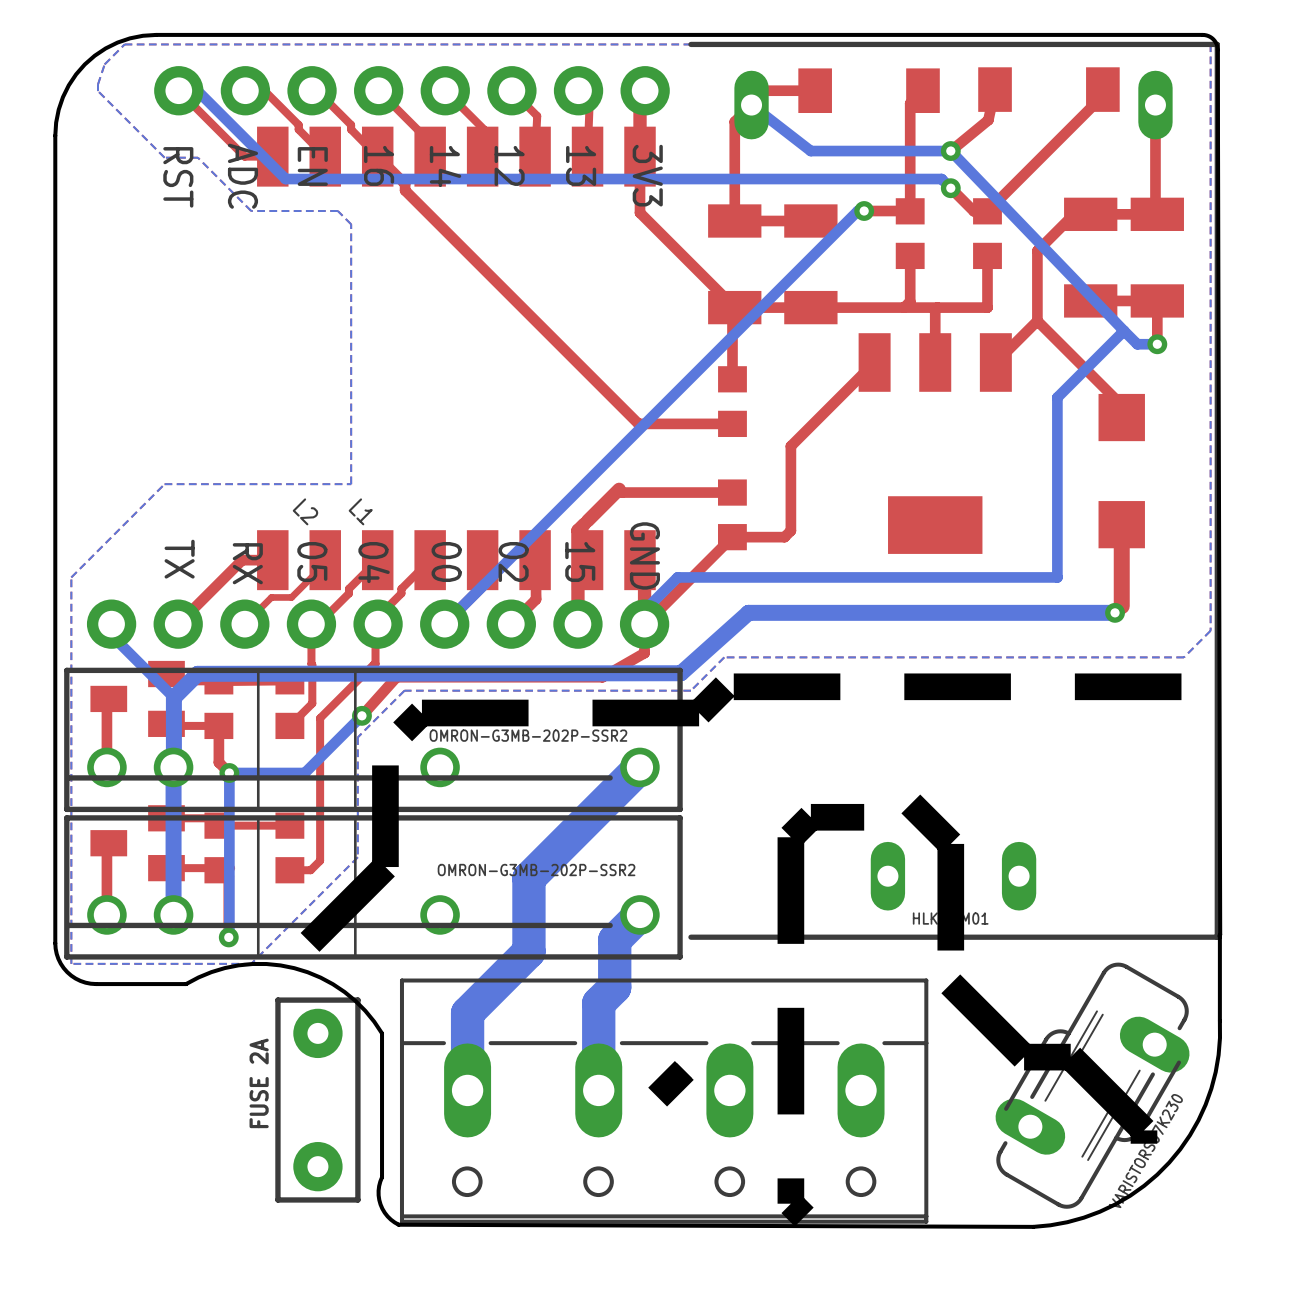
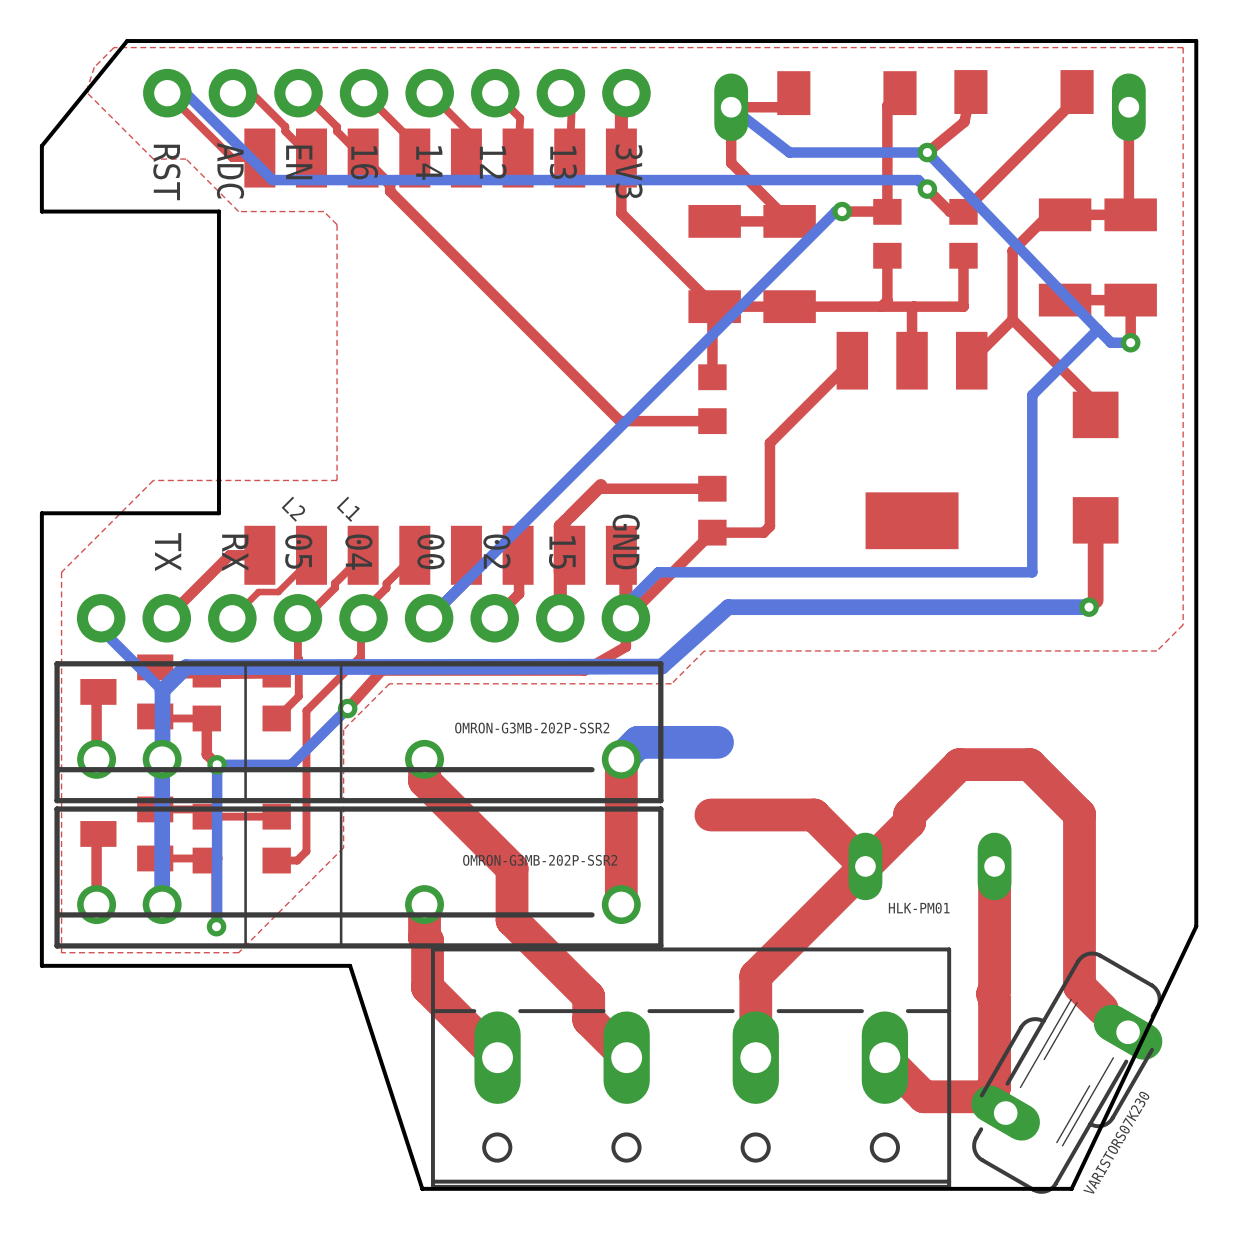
board edge: none -> (1196, 41) (127, 41) (41, 145) (41, 211) (218, 211) (218, 513) (41, 513) (41, 965) (350, 965) (422, 1188) (1071, 1188) (1196, 926) (1196, 41)
line: (690, 44) (1217, 44) (1217, 937) (690, 937) -> none
bottom zone outline: (1210, 44) (1210, 630) (1183, 657) (724, 657) (690, 690) (404, 690) (357, 737) (357, 857) (251, 963) (71, 963) (71, 577) (164, 484) (351, 484) (351, 224) (337, 211) (251, 211) (197, 157) (164, 157) (98, 91) (98, 84) (104, 64) (124, 44) (1210, 44) -> none
top track: (815, 90) (765, 90) (734, 121) (734, 220) -> (793, 93) (779, 107) (731, 107) (731, 162) (789, 221)
board edge: (1181, 686) (725, 686) (699, 713) (421, 713) (402, 731) -> none
board edge: (385, 765) (385, 867) (265, 987) -> none
top track: none -> (424, 759) (424, 780) (512, 868) (512, 920) (588, 996) (588, 1019) (626, 1057)
top track: none -> (621, 759) (621, 904)
bottom track: (639, 767) (528, 878) (528, 951) (467, 1013) (467, 1090) -> (621, 759) (638, 742) (717, 742)
board edge: (910, 803) (950, 843) (950, 983) (1024, 1057) (1070, 1057) (1144, 1130) (1144, 1143) -> none
board edge: (864, 817) (810, 817) (790, 837) (790, 1203) (804, 1217) -> none
top track: none -> (710, 814) (814, 814) (865, 866)
top track: none -> (994, 866) (994, 990) (992, 993) (994, 999) (994, 1086) (984, 1096) (924, 1096) (884, 1057)
top track: none -> (424, 904) (424, 937) (427, 940) (427, 987) (497, 1057)
bottom track: (639, 914) (614, 940) (614, 987) (598, 1003) (598, 1090) -> none
board edge: (1219, 934) (1219, 1020) (1219, 1038) (1218, 1055) (1211, 1088) (1198, 1120) (1180, 1149) (1157, 1174) (1115, 1204) (1083, 1217) (1033, 1226) (398, 1224) (390, 1219) (382, 1208) (378, 1195) (382, 1177) (382, 1033) (365, 1010) (344, 992) (307, 972) (266, 964) (224, 968) (186, 984) (90, 983) (71, 975) (60, 963) (56, 953) (55, 135) (58, 109) (68, 85) (76, 74) (94, 55) (117, 42) (142, 35) (156, 34) (1202, 34) (1211, 38) (1216, 44) (1217, 49) (1220, 934) (1219, 934) (1219, 935) (1219, 935) (1219, 936) (1219, 936) (1219, 936) (1219, 936) -> none
top track: none -> (1102, 1009) (1079, 986) (1079, 814) (1029, 764) (959, 764) (909, 814) (909, 822) (755, 976) (755, 1057)
board edge: (664, 1090) (684, 1070) (657, 1097) -> none
part: FUSE 2A (317, 1100) -> none
part position: (664, 1101) -> (691, 1068)

